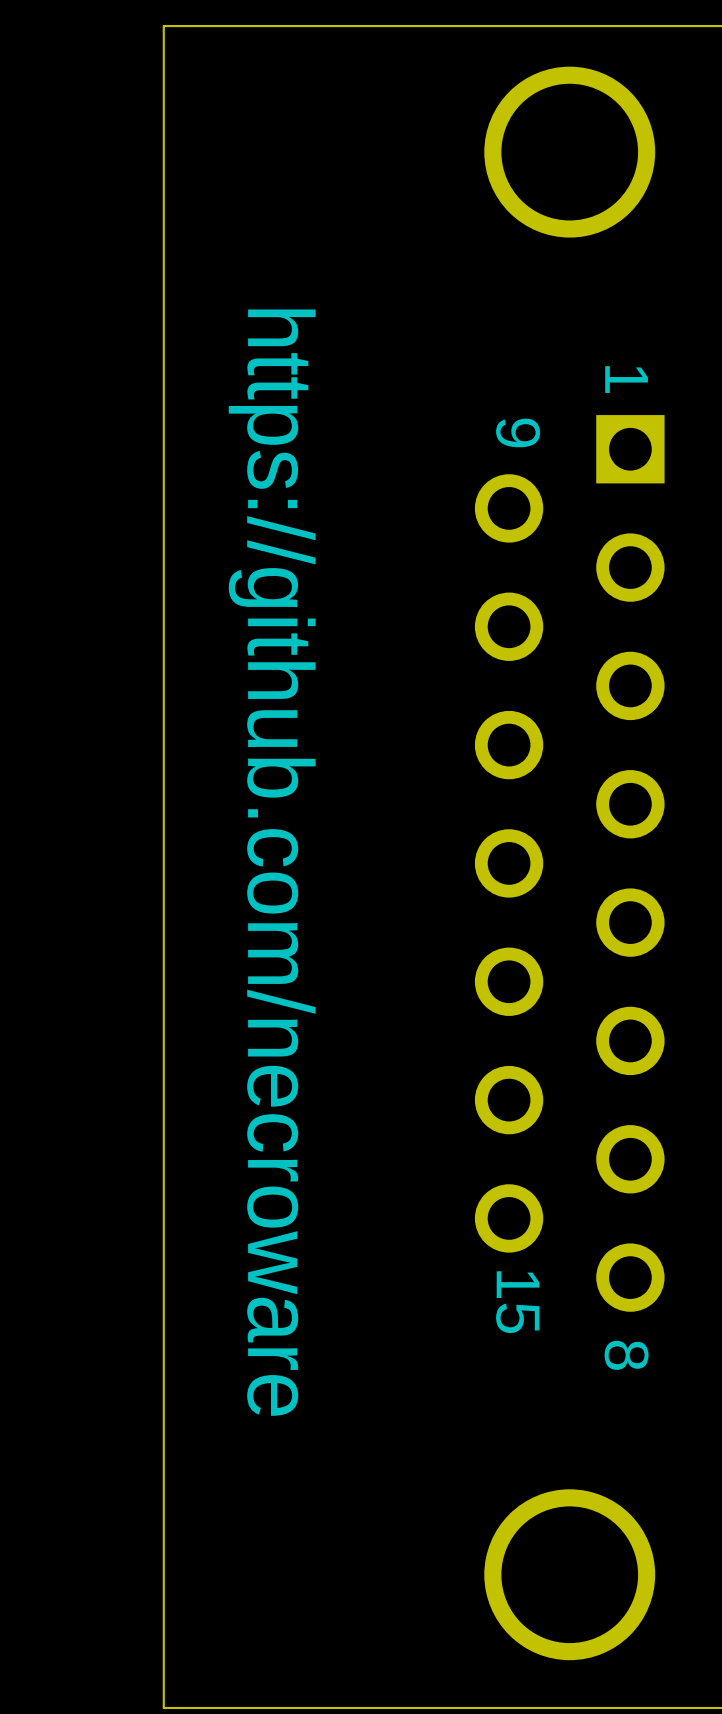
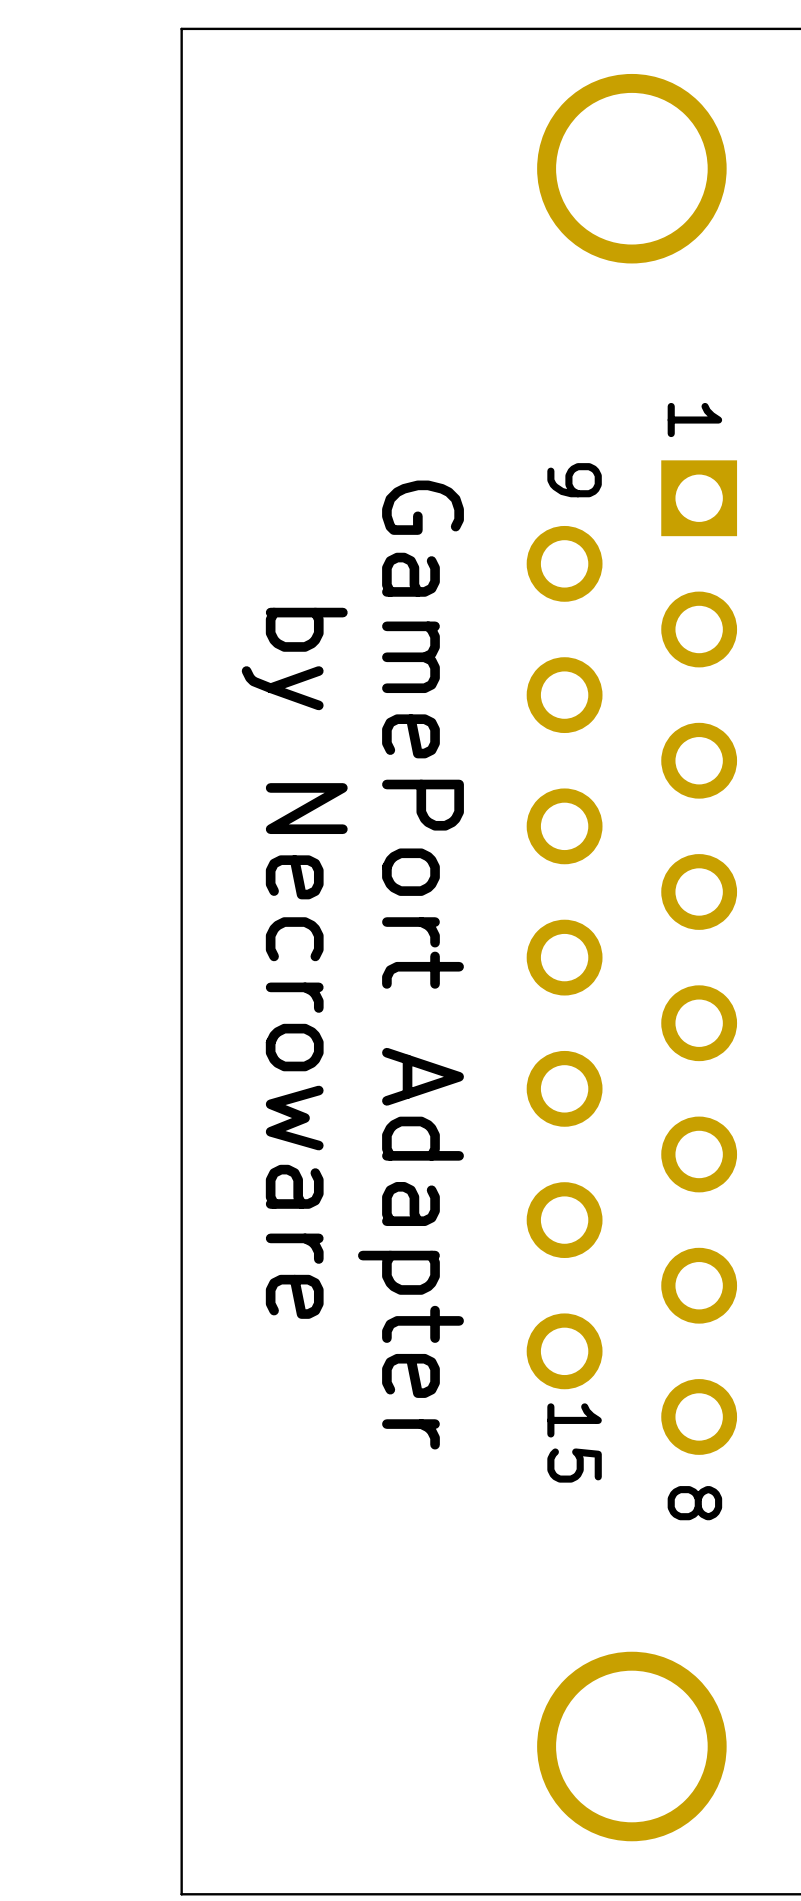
text: https://github.com/necroware (272, 862) -> by Necroware (294, 963)
text: none -> GamePort Adapter (410, 965)

